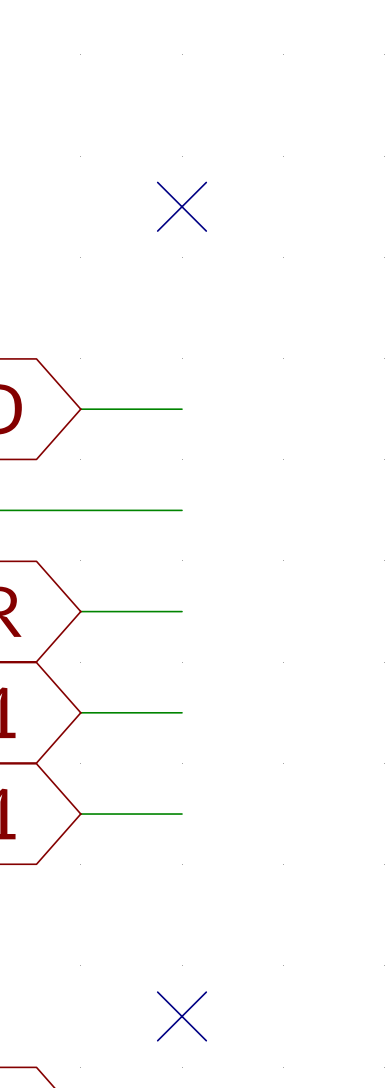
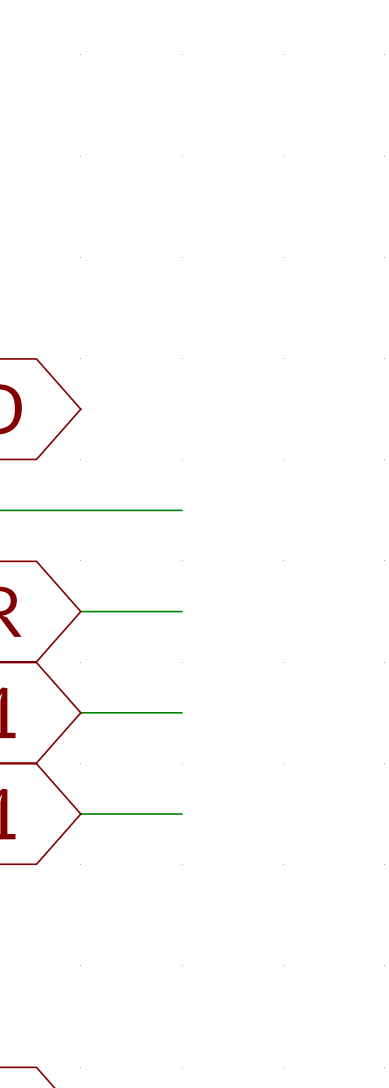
no-connect mark: (182, 206) -> none
wire: (80, 409) (182, 409) -> none
no-connect mark: (182, 1016) -> none

